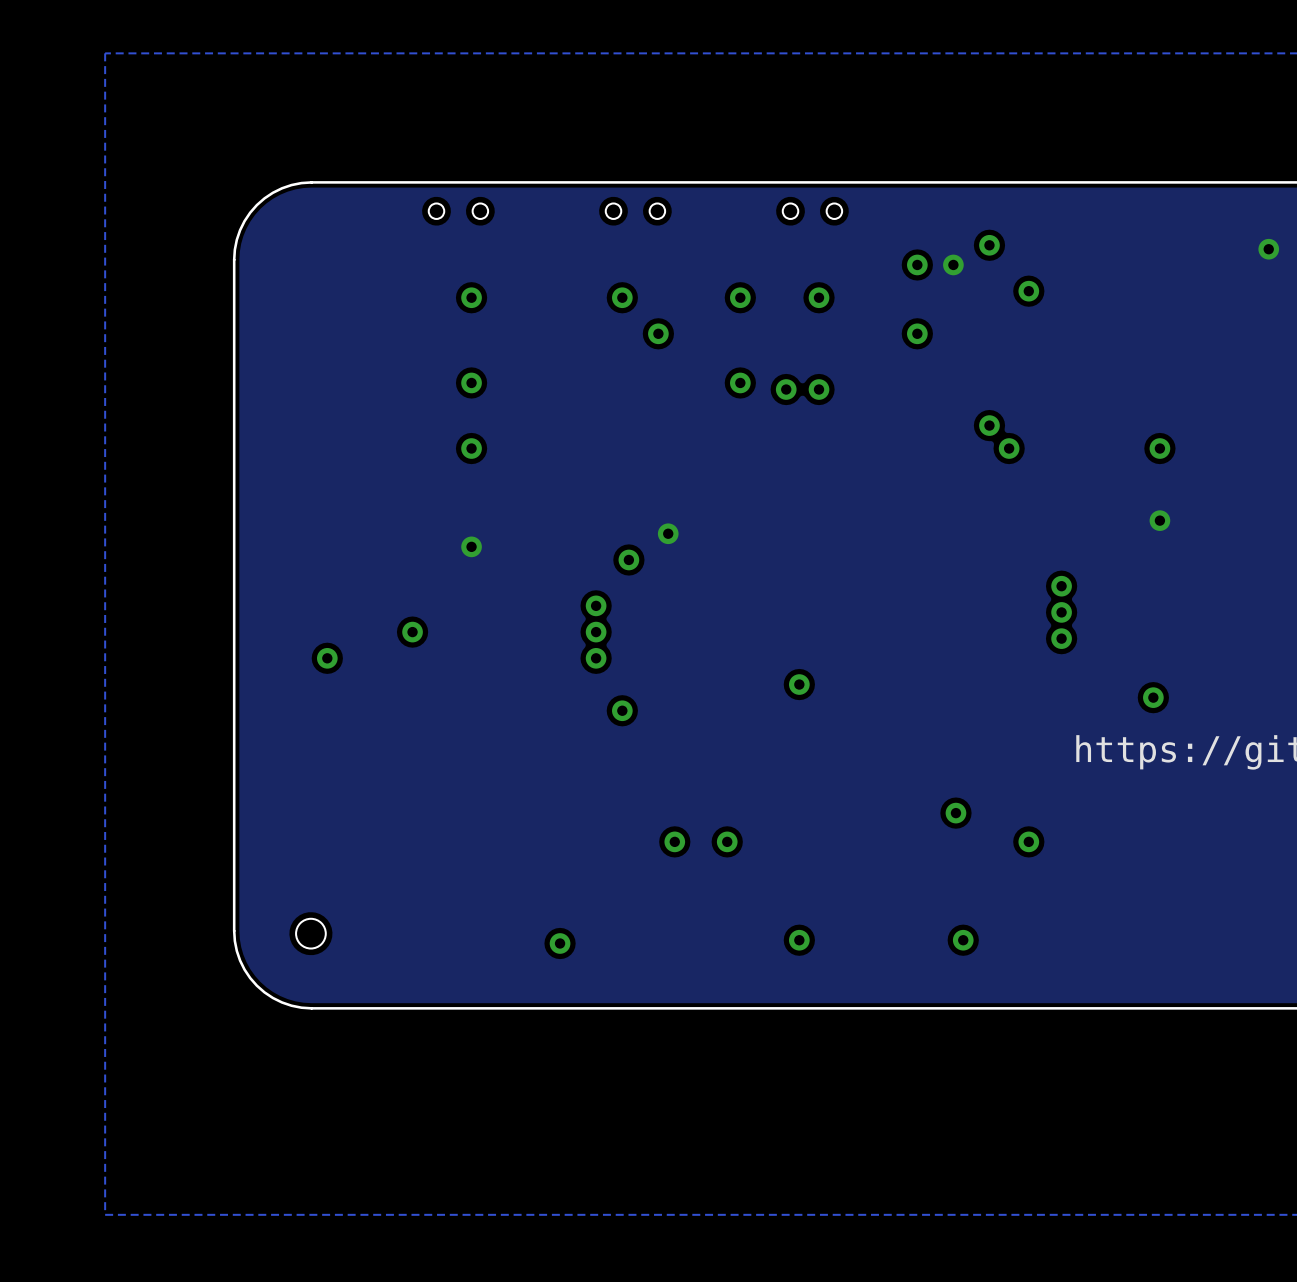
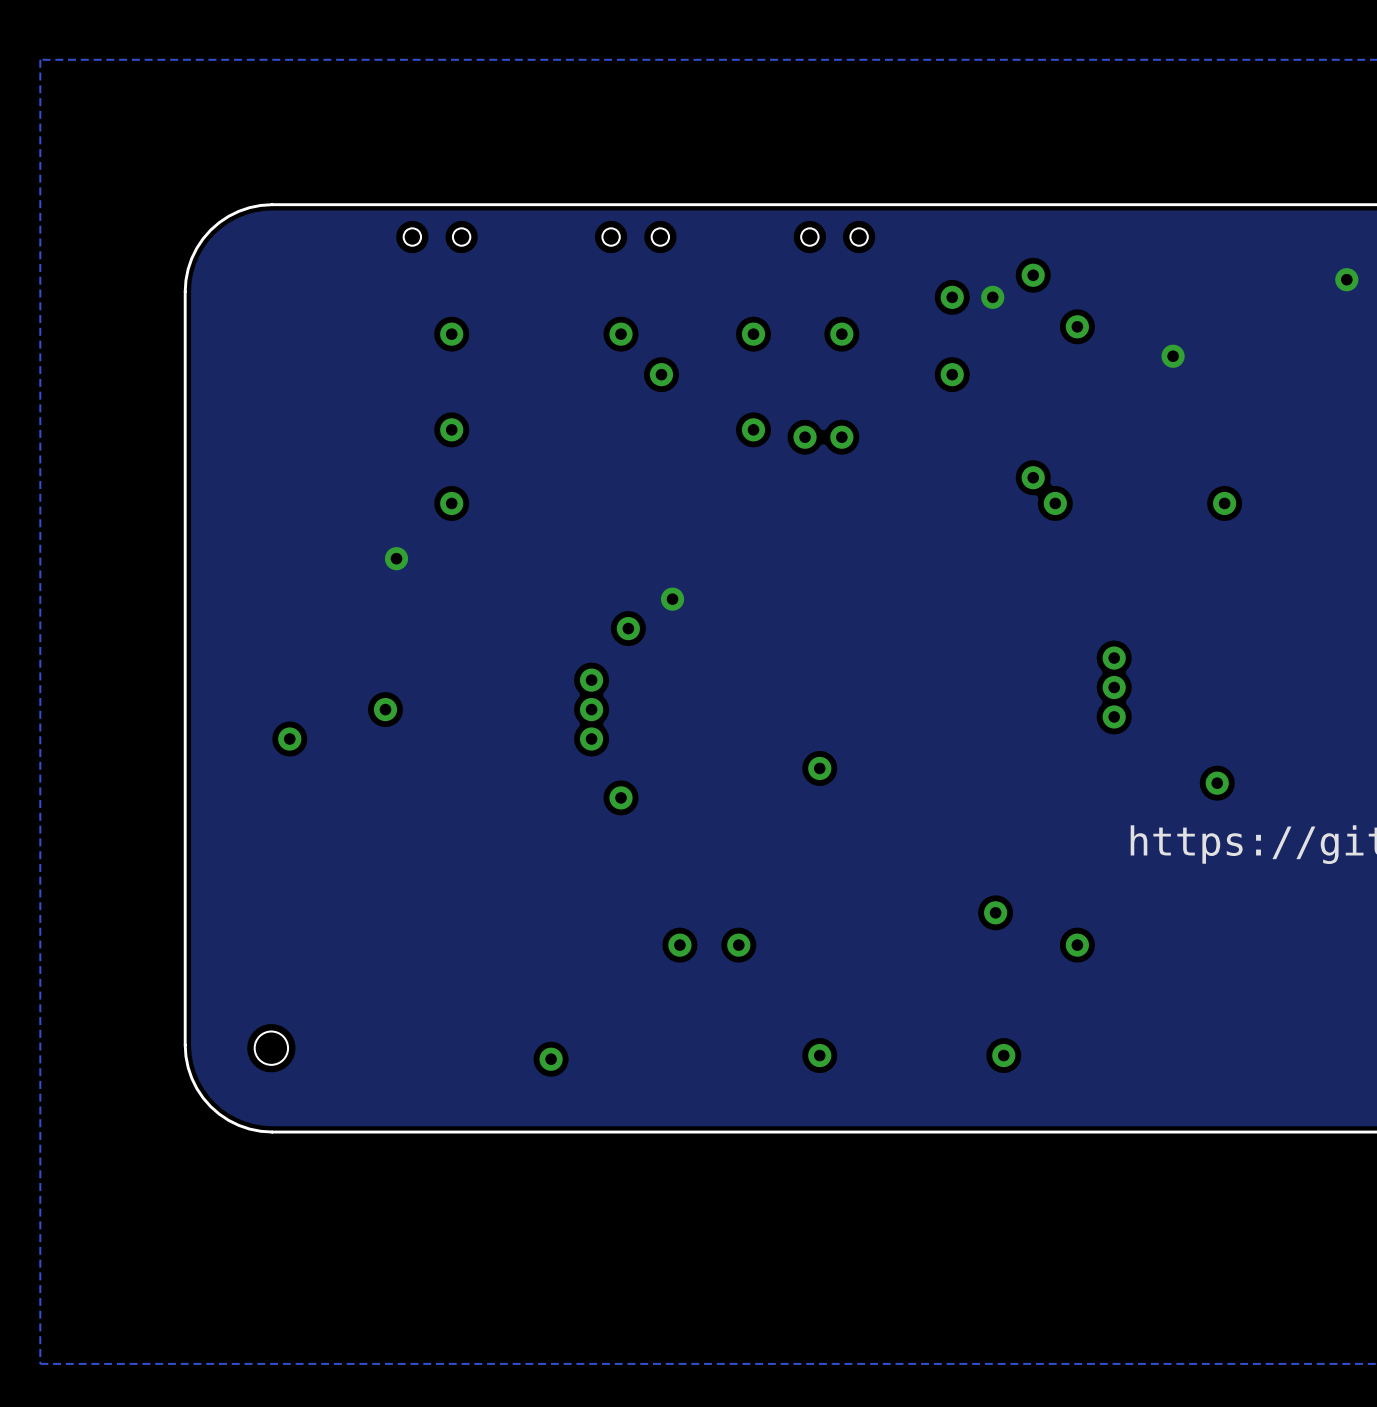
via: none -> (1173, 356)
via: (1159, 520) -> none
via position: (471, 546) -> (396, 558)

